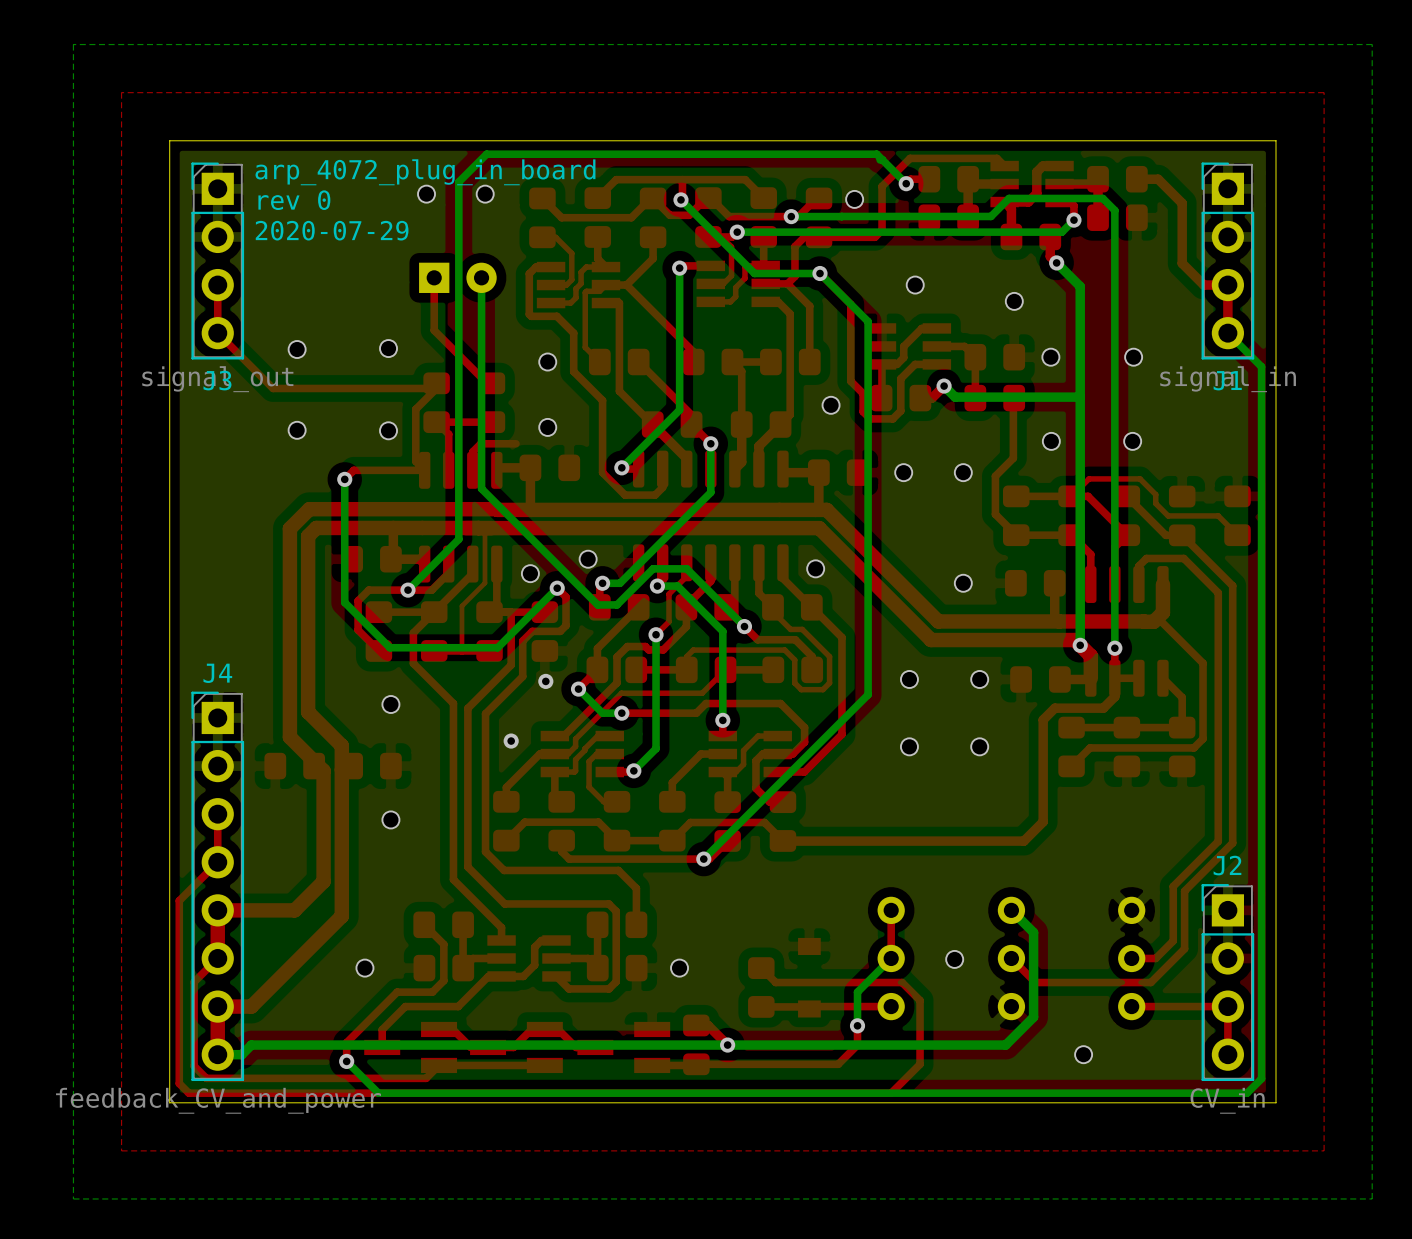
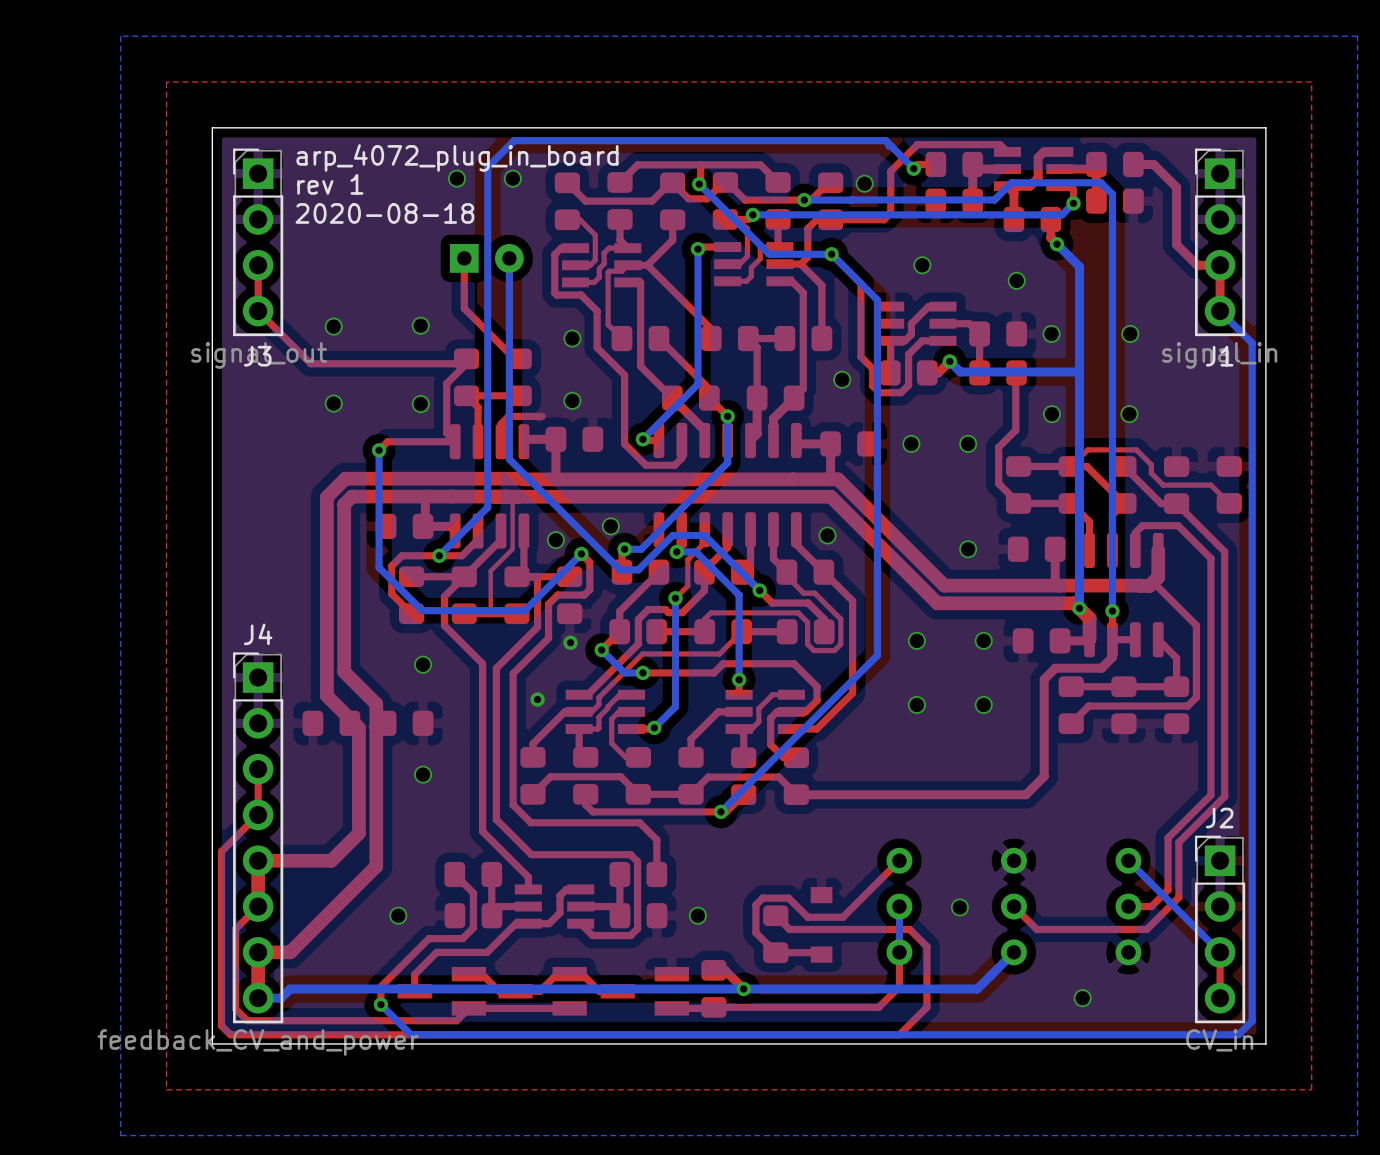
text: rev 0 (294, 200) -> rev 1 (330, 184)
text: 2020-07-29 (332, 230) -> 2020-08-18 (384, 213)
top track: (891, 910) (891, 958) -> (899, 860) (842, 917) (807, 917) (788, 898) (762, 898) (755, 905) (755, 932) (775, 952)
bottom track: (1011, 910) (1033, 932) (1033, 1017) (1005, 1045) (972, 1045) -> (1013, 952) (977, 989)
bottom track: none -> (1128, 860) (1220, 952)
bottom track: (891, 958) (857, 992) (857, 1025) -> (899, 906) (899, 952)
top track: (891, 1006) (811, 1006) -> none
top track: (1227, 1006) (1131, 1006) -> none
top track: (857, 1025) (857, 1045) (838, 1064) -> (899, 952) (899, 986) (878, 1007) (849, 1007)
via: (857, 1025) -> none

